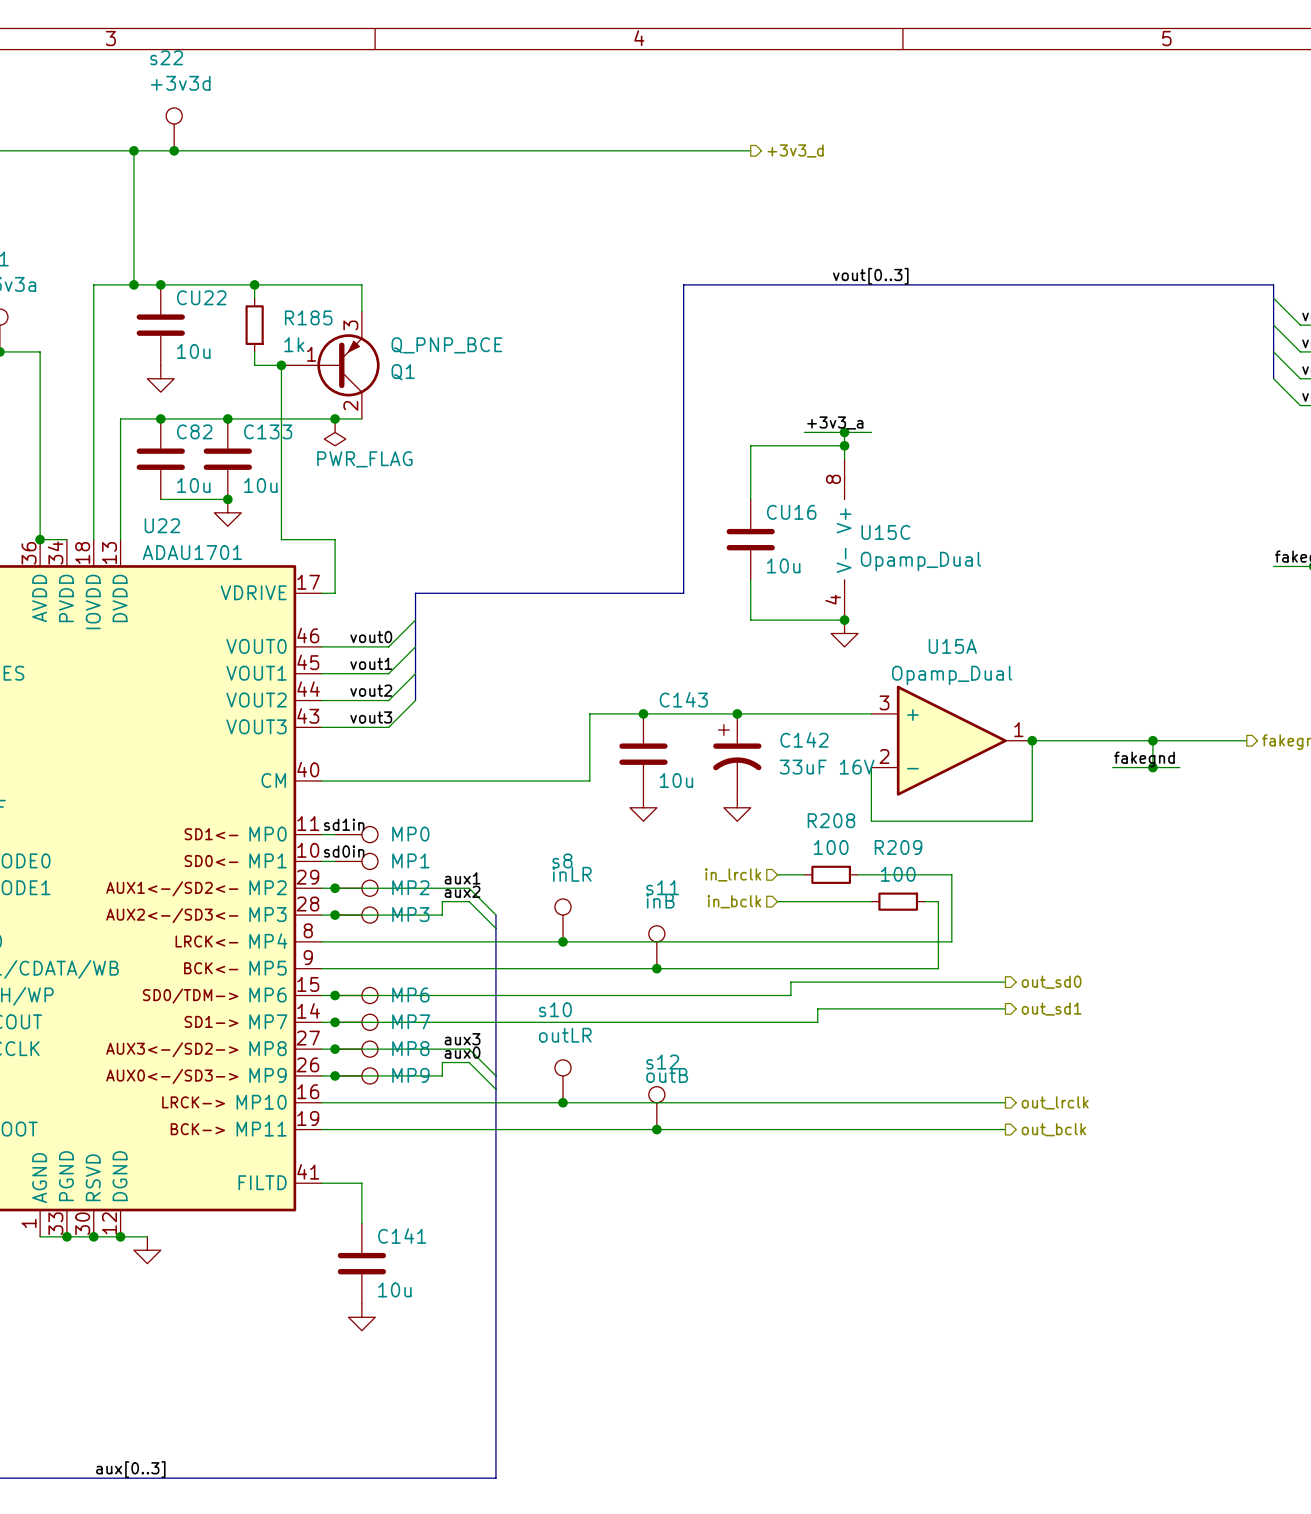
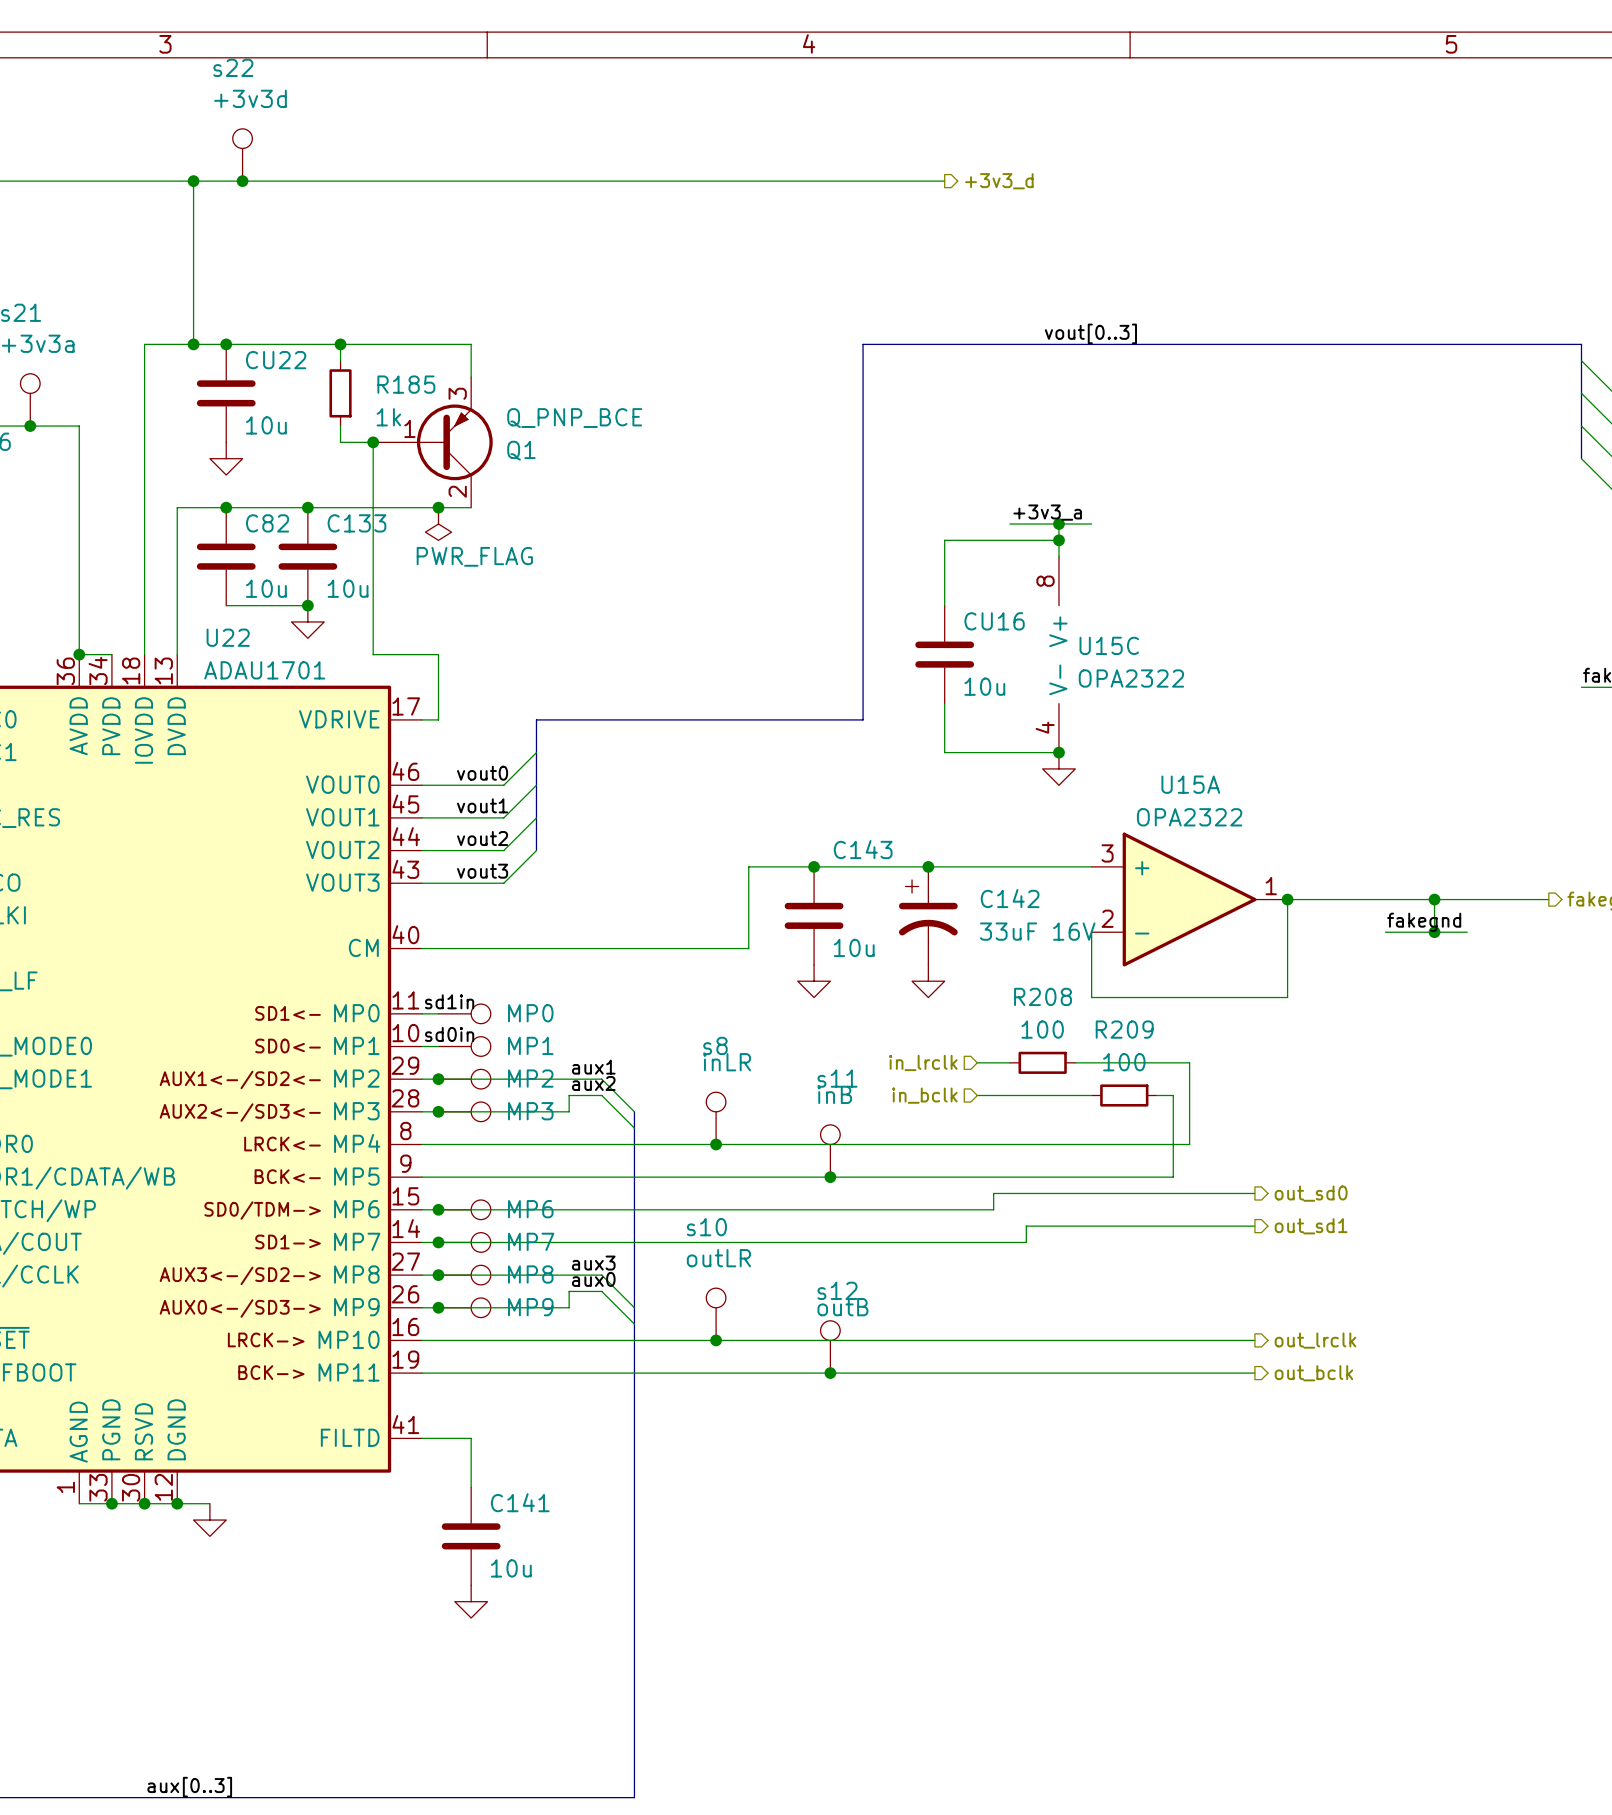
U15C value: Opamp_Dual (920, 561) -> OPA2322 (1131, 678)
U15A value: Opamp_Dual (952, 675) -> OPA2322 (1189, 817)

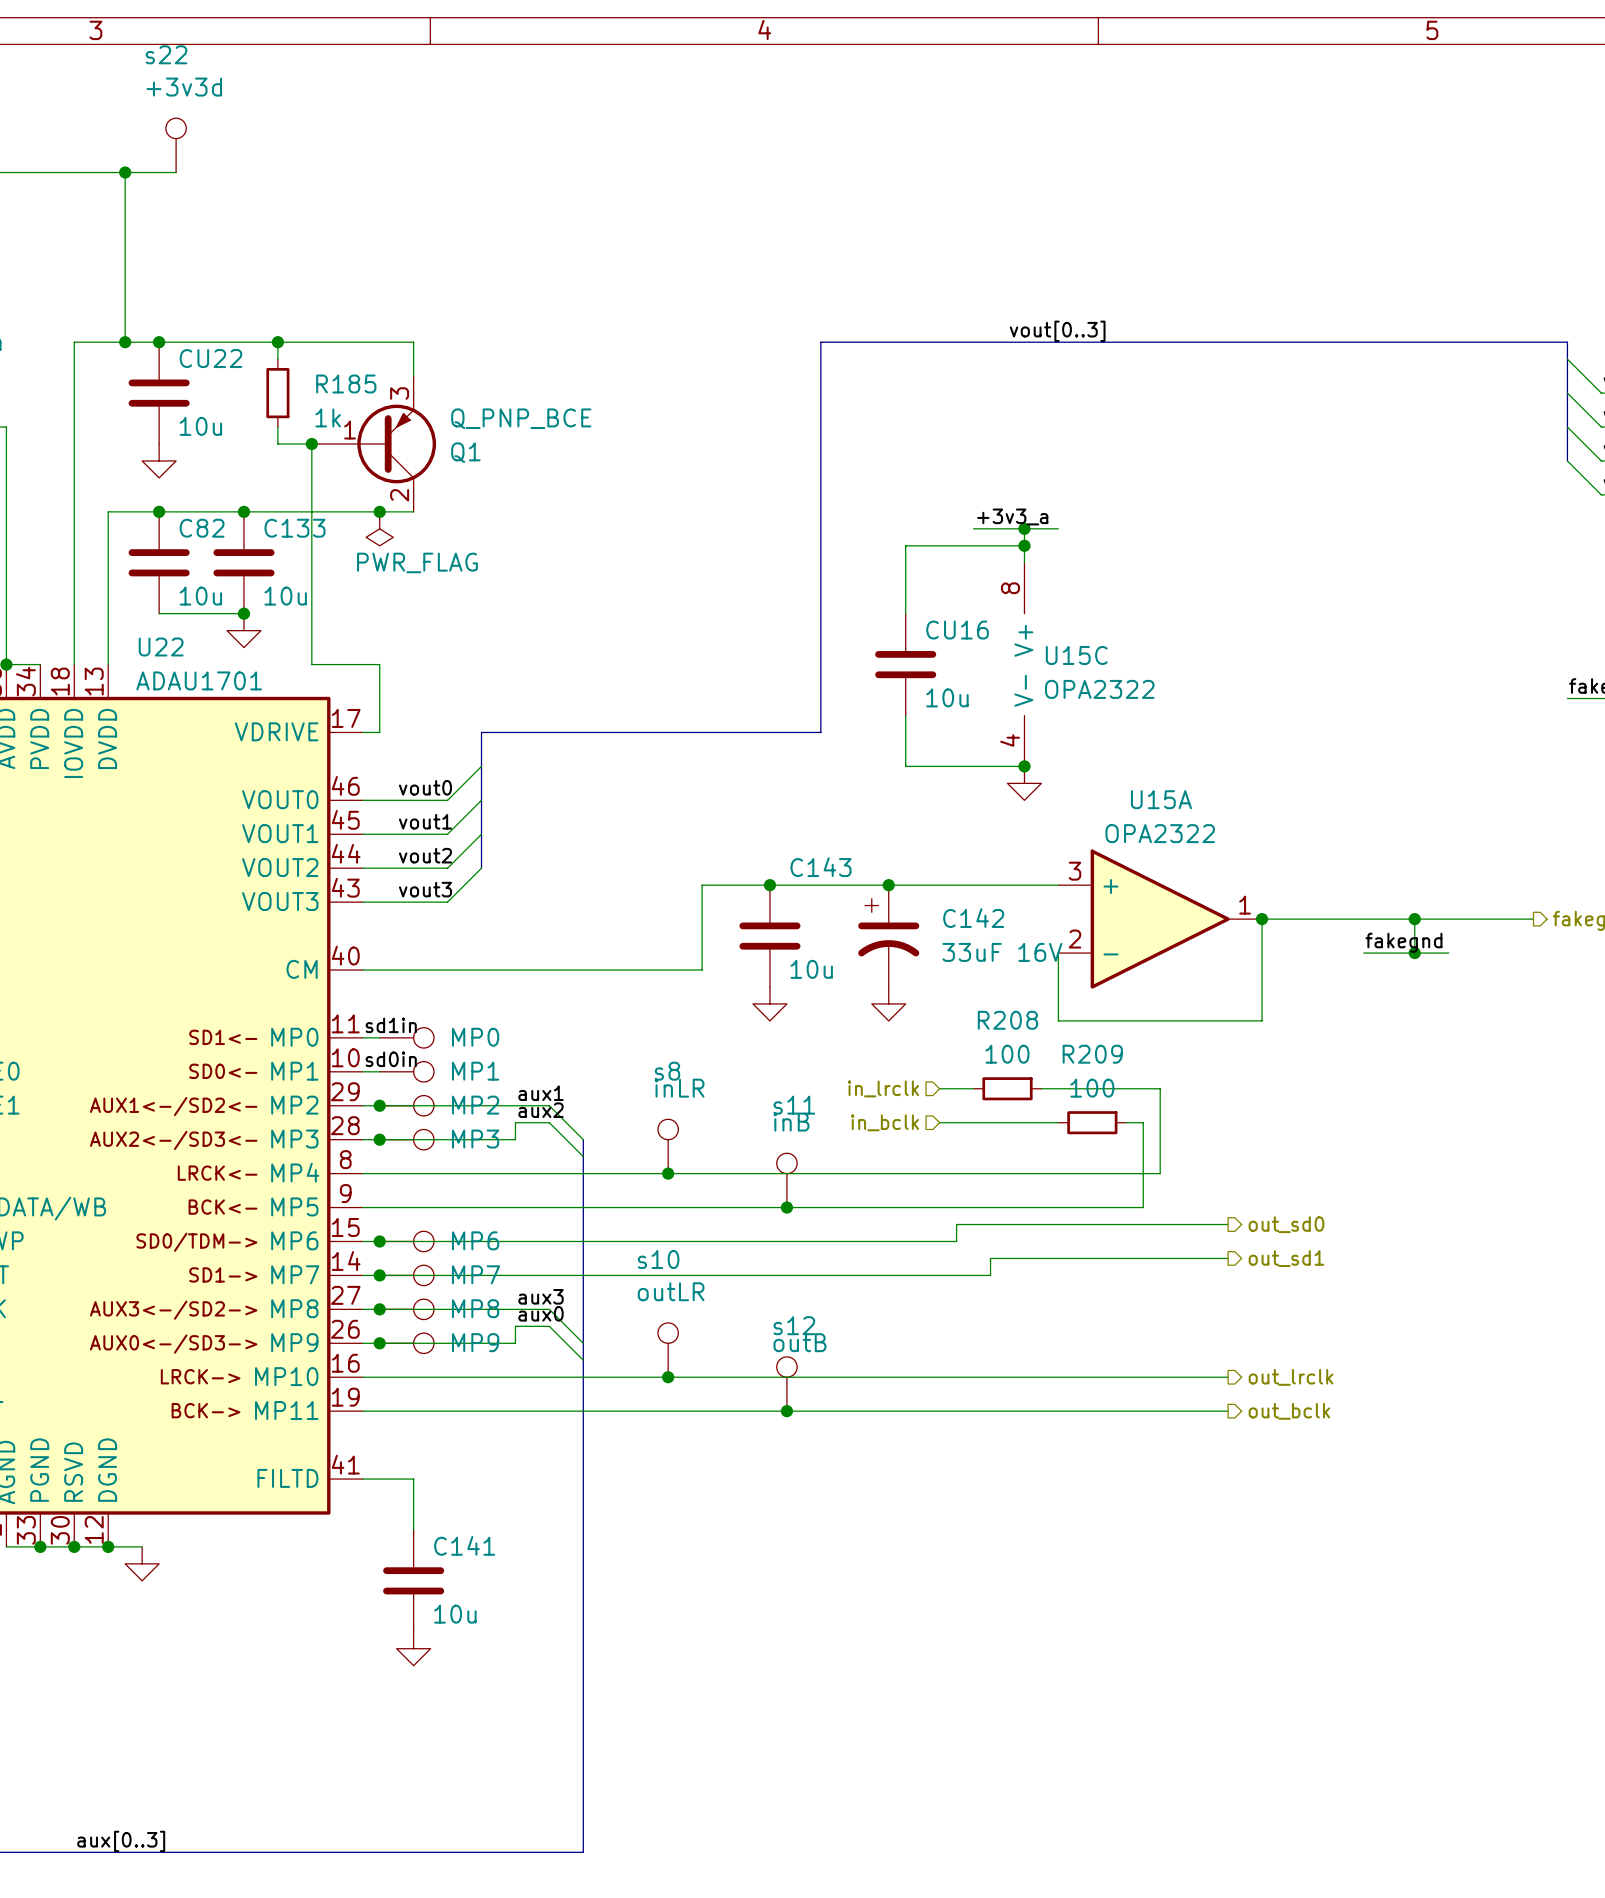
wire: (242, 181) (944, 181) -> none
junction: (242, 181) -> none
hierarchical label: +3v3_d (999, 181) -> none

